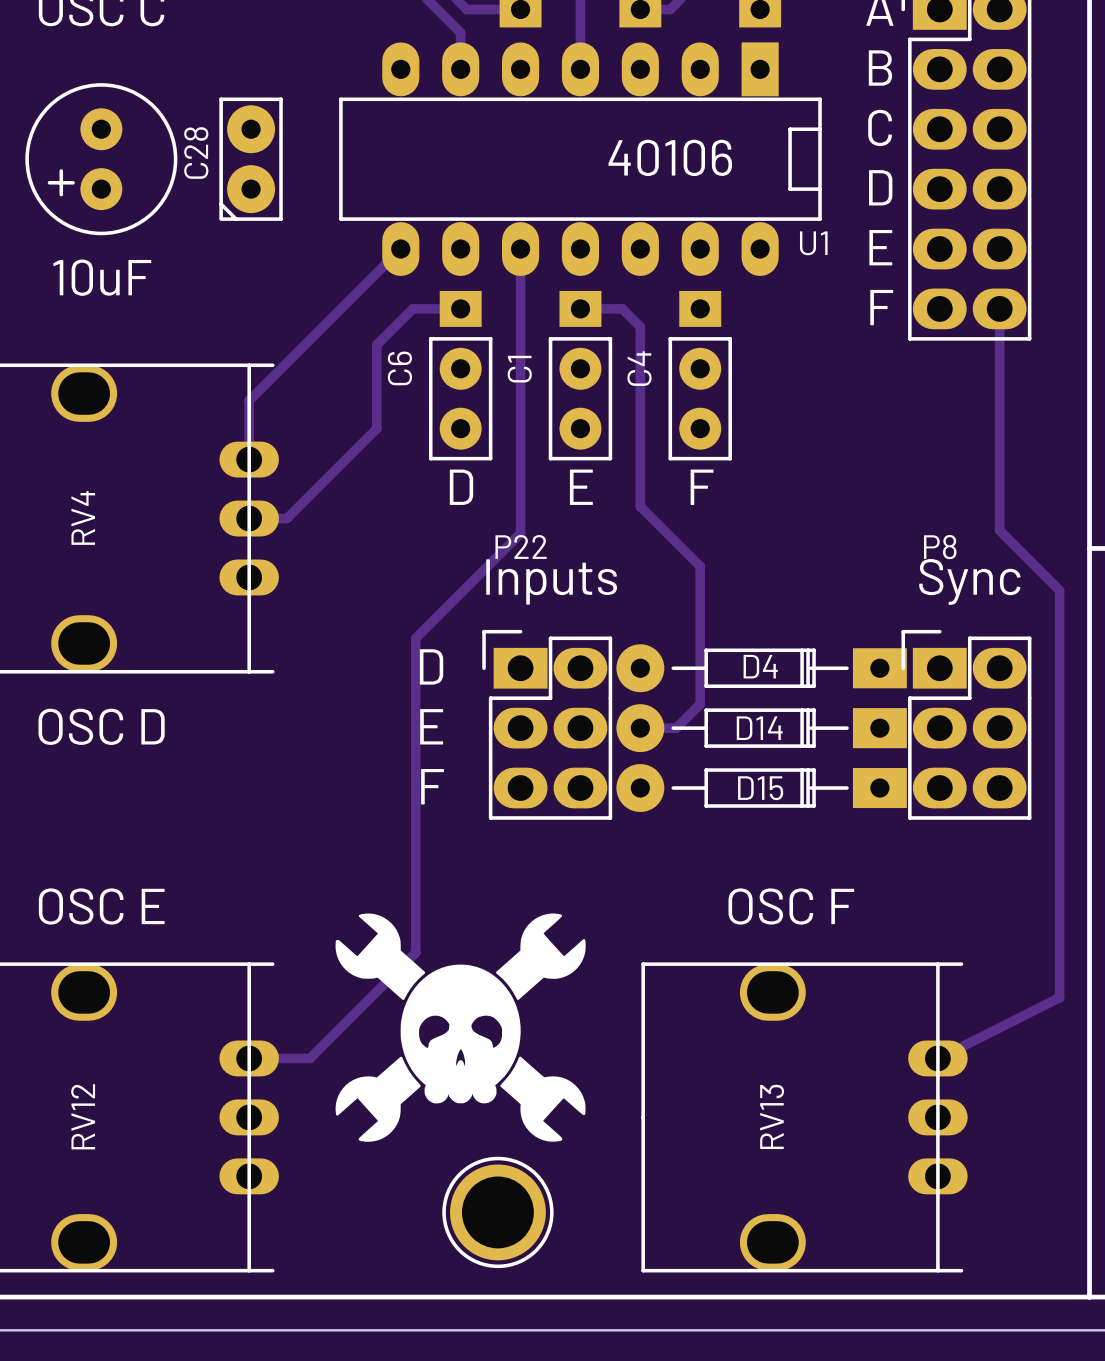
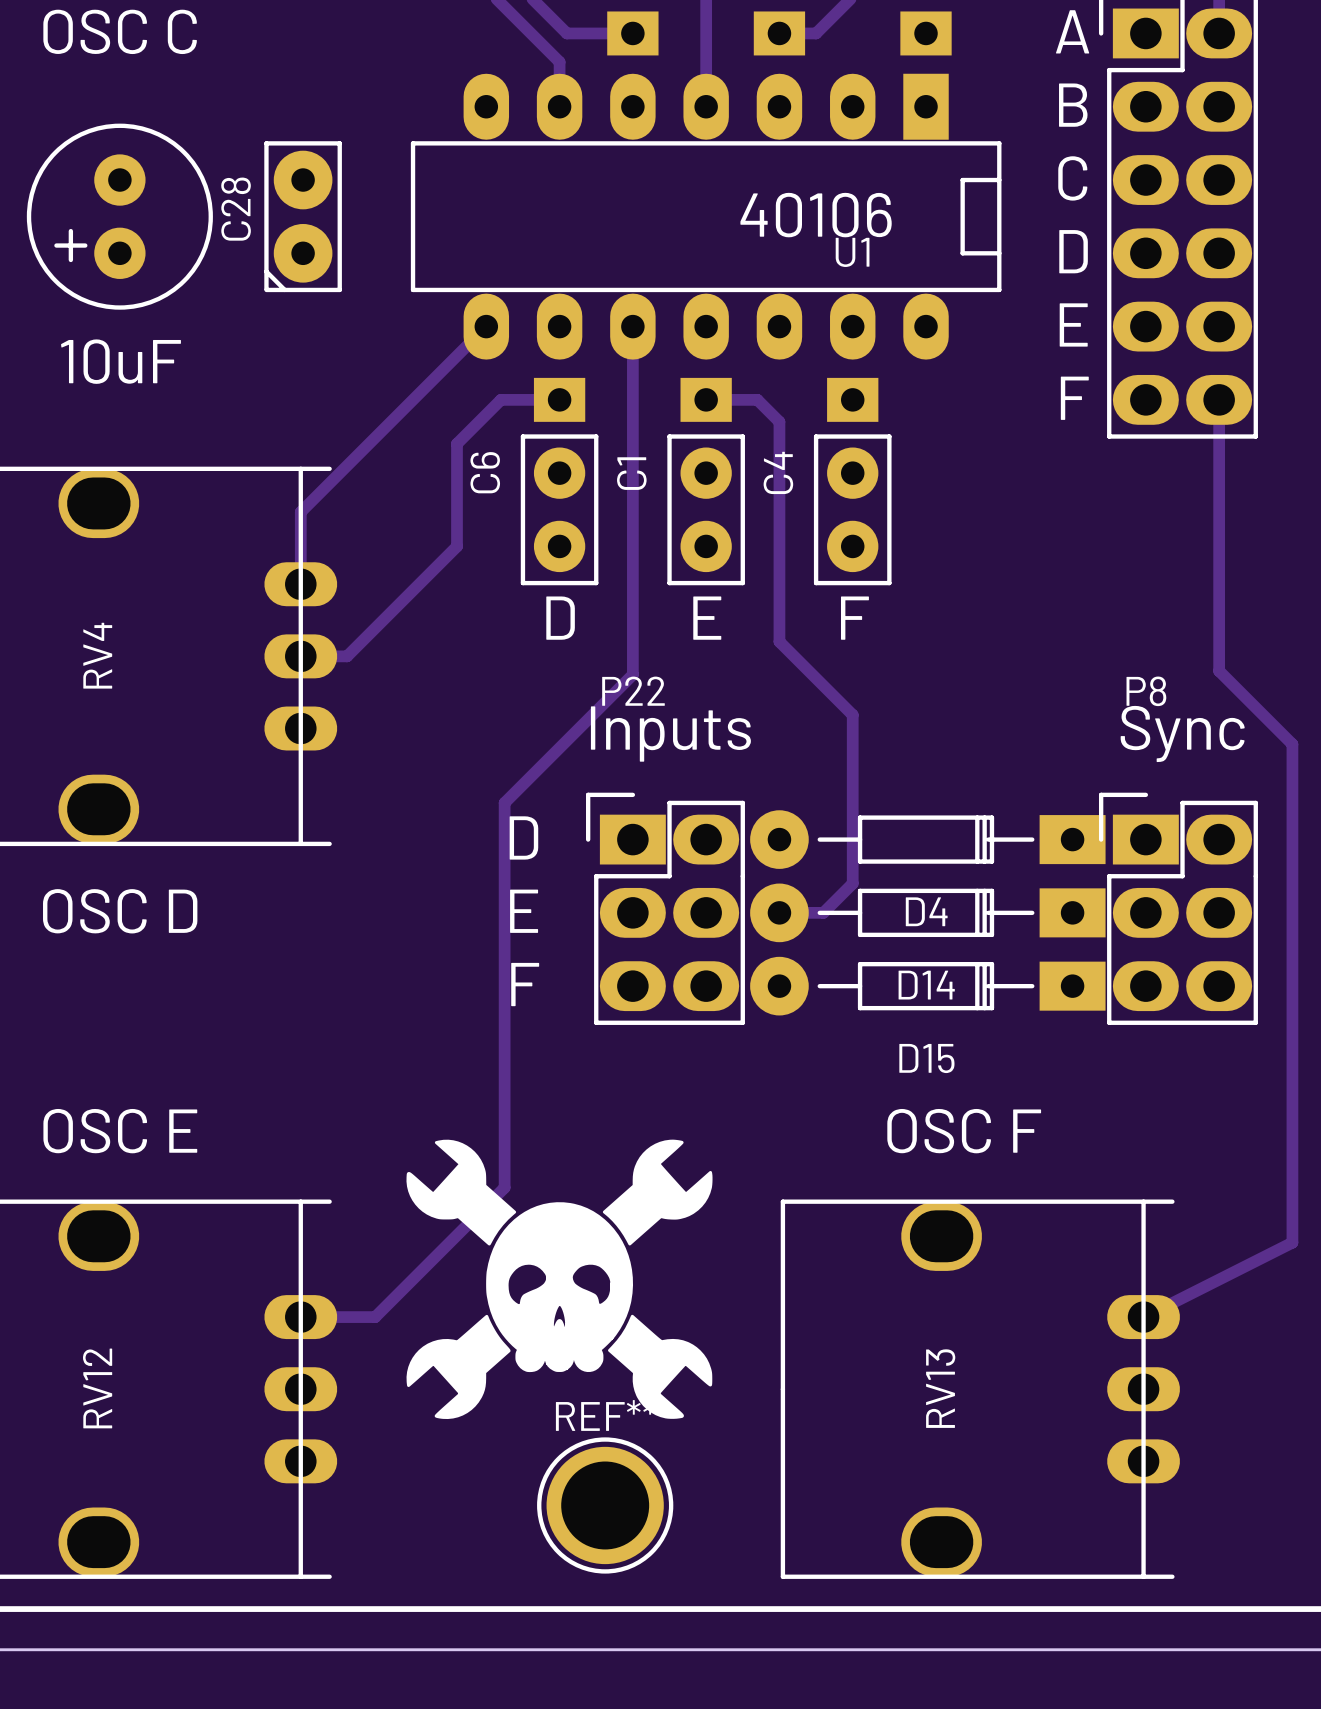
U1 name position: U1 (813, 243) -> U1 (852, 252)
D4 name position: D4 (760, 666) -> D4 (926, 911)
D14 name position: D14 (759, 728) -> D14 (926, 985)
D15 name position: D15 (760, 788) -> D15 (926, 1058)
REF** name: none -> REF** (606, 1415)

